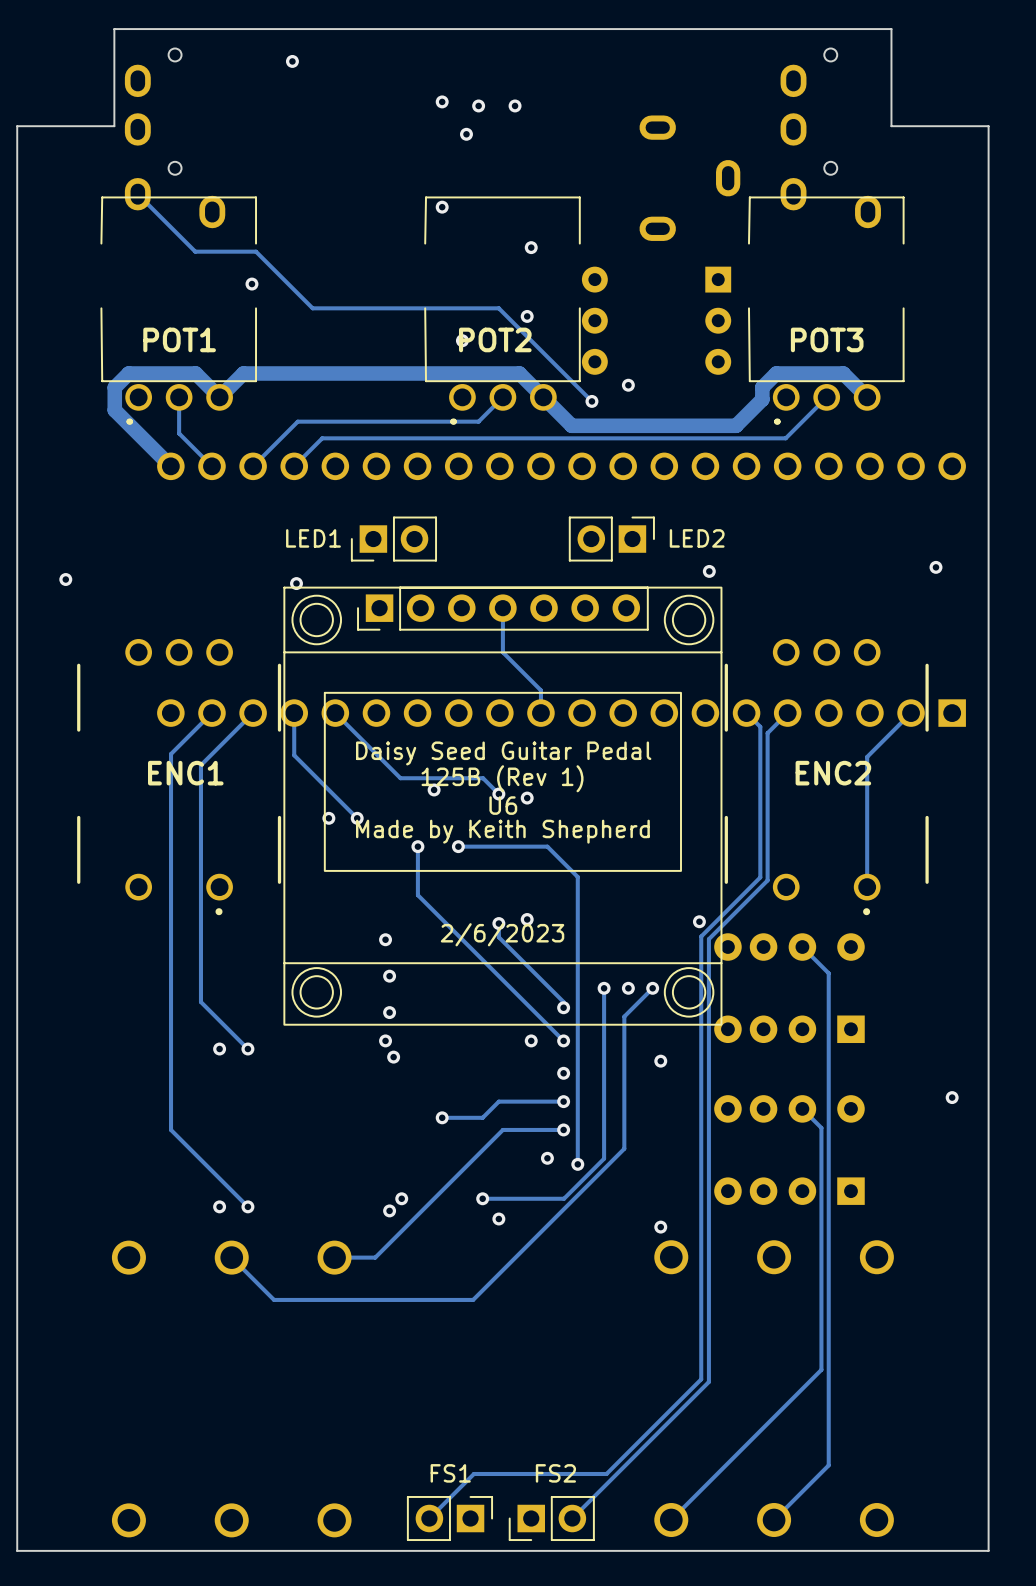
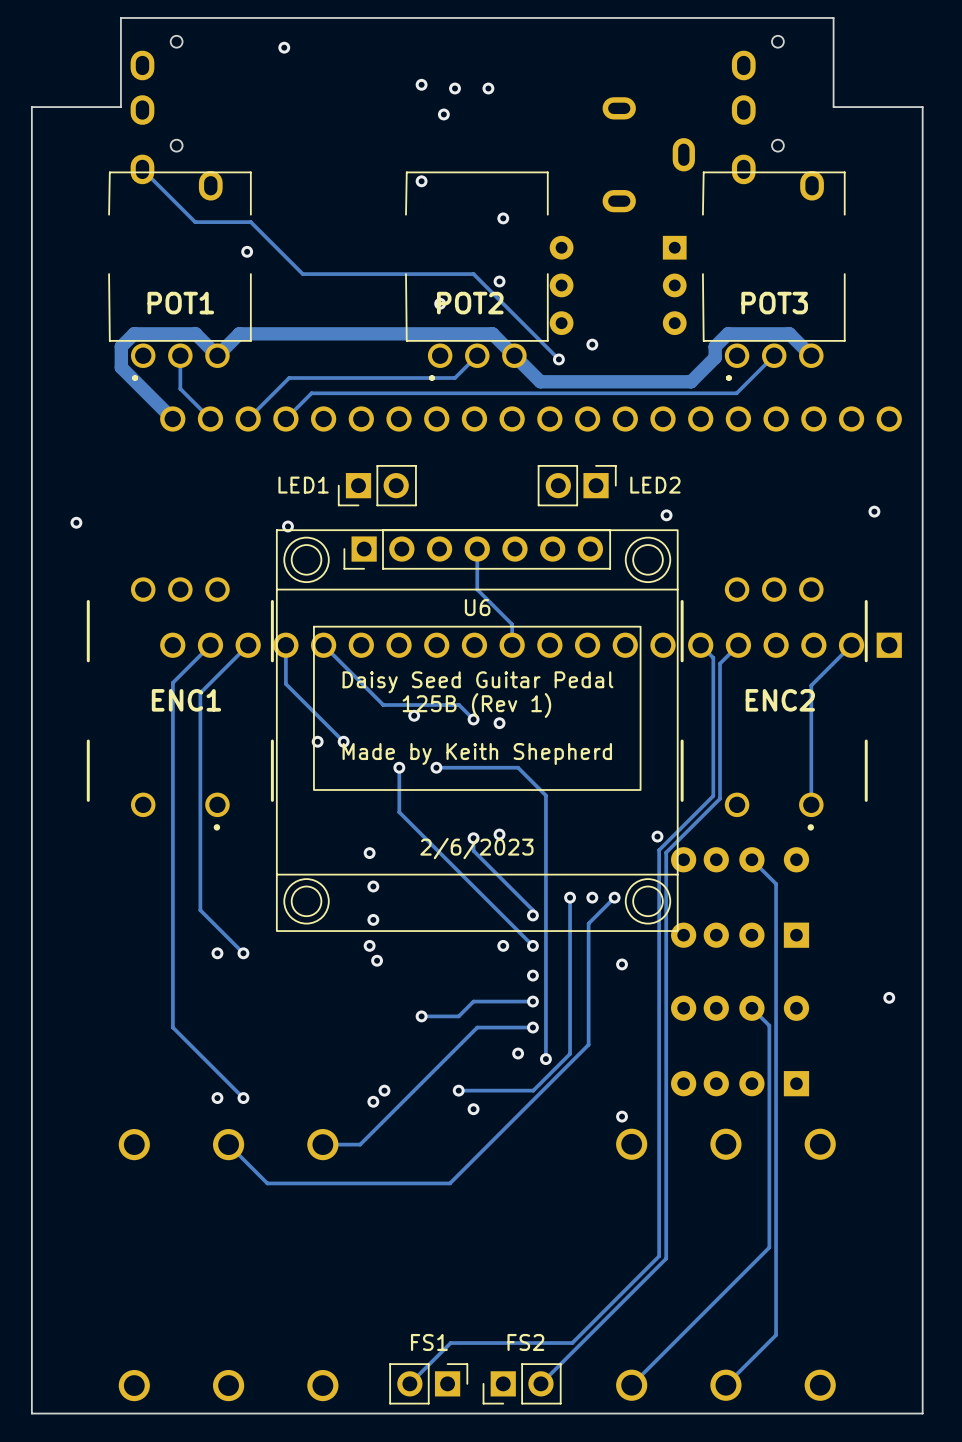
U6 name position: U6 (503, 805) -> U6 (477, 607)

